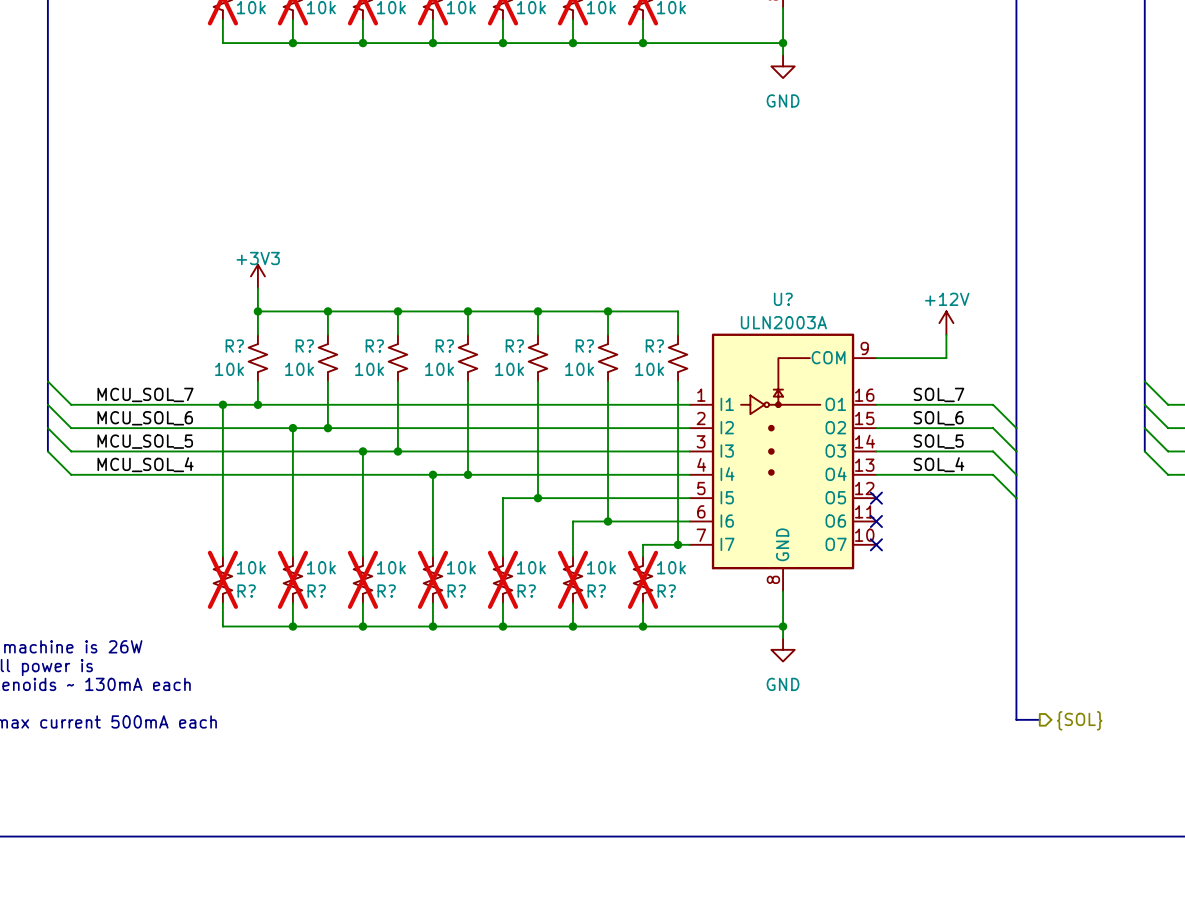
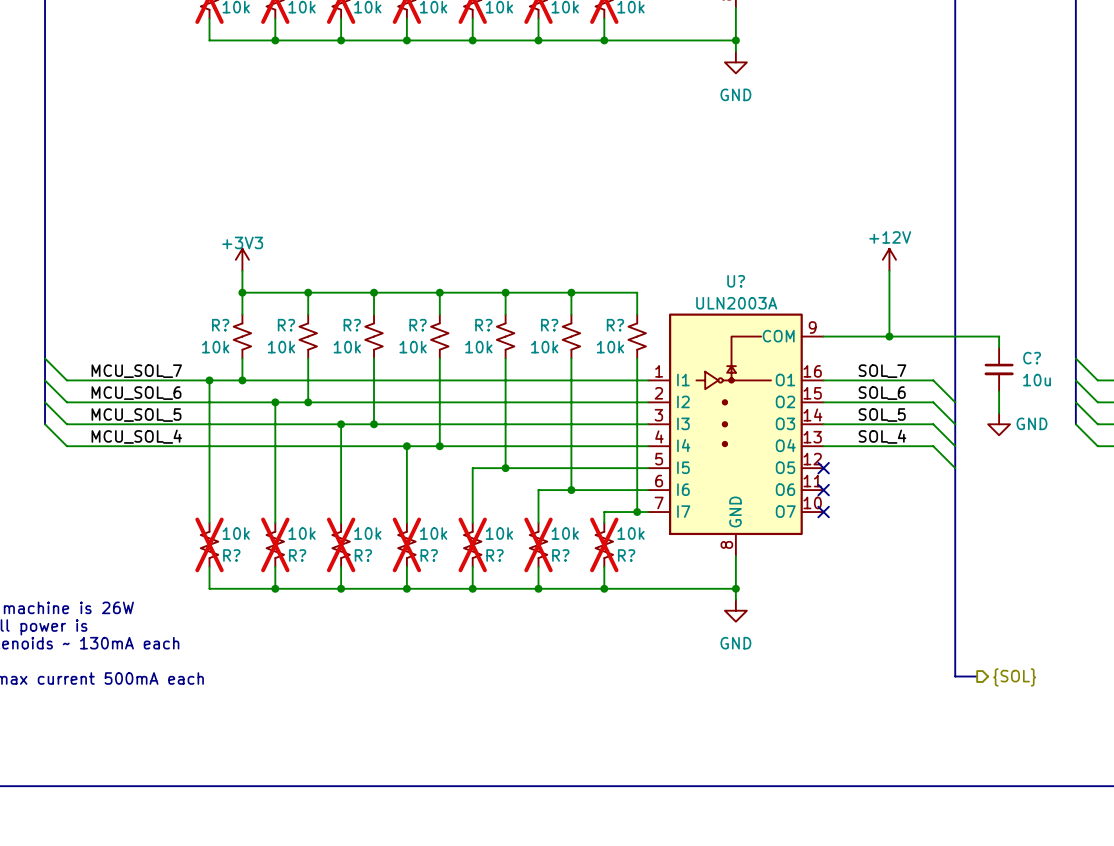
power symbol position: +12V (946, 323) -> +12V (889, 259)
wire: none -> (889, 336) (999, 336) (999, 347)
junction: none -> (889, 336)
C?: none -> 10u (999, 369)
wire: none -> (999, 391) (999, 413)
power symbol: none -> GND (999, 424)

